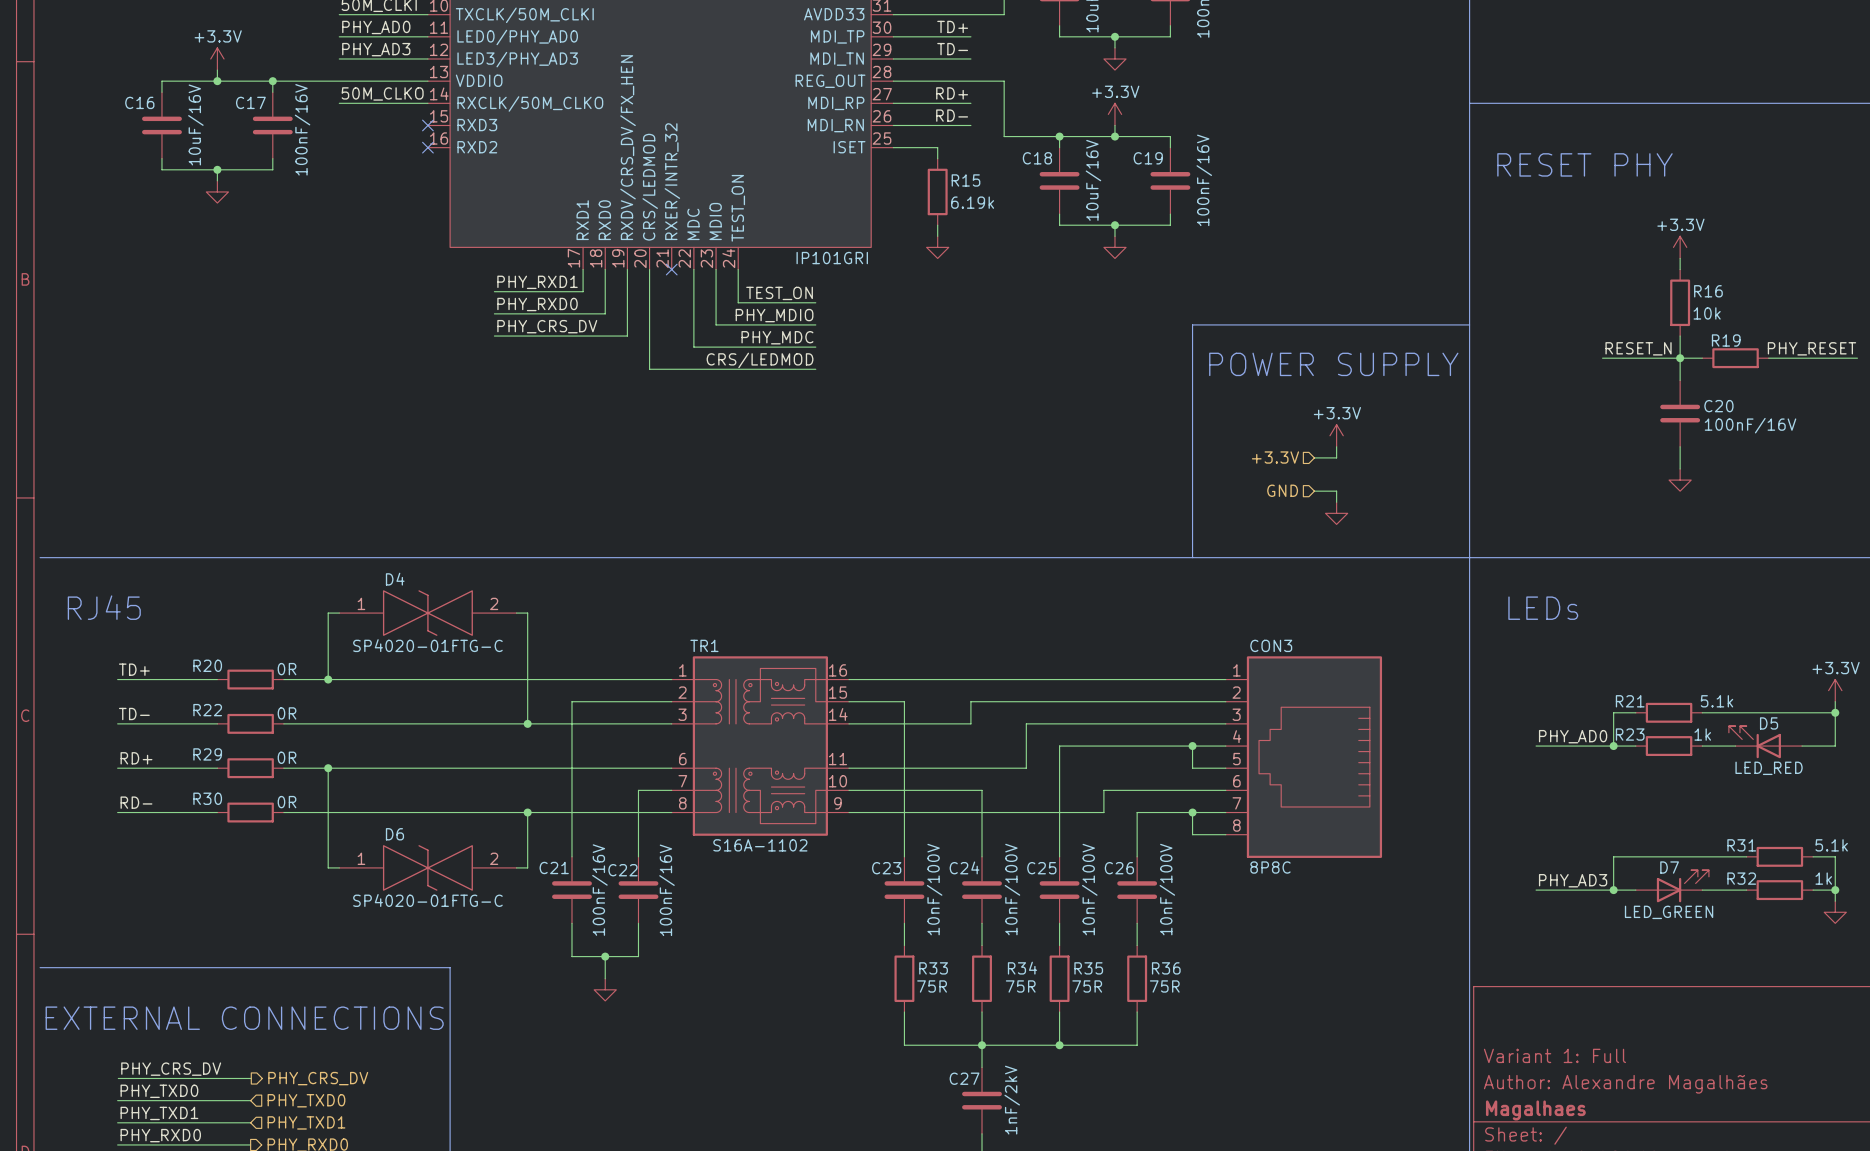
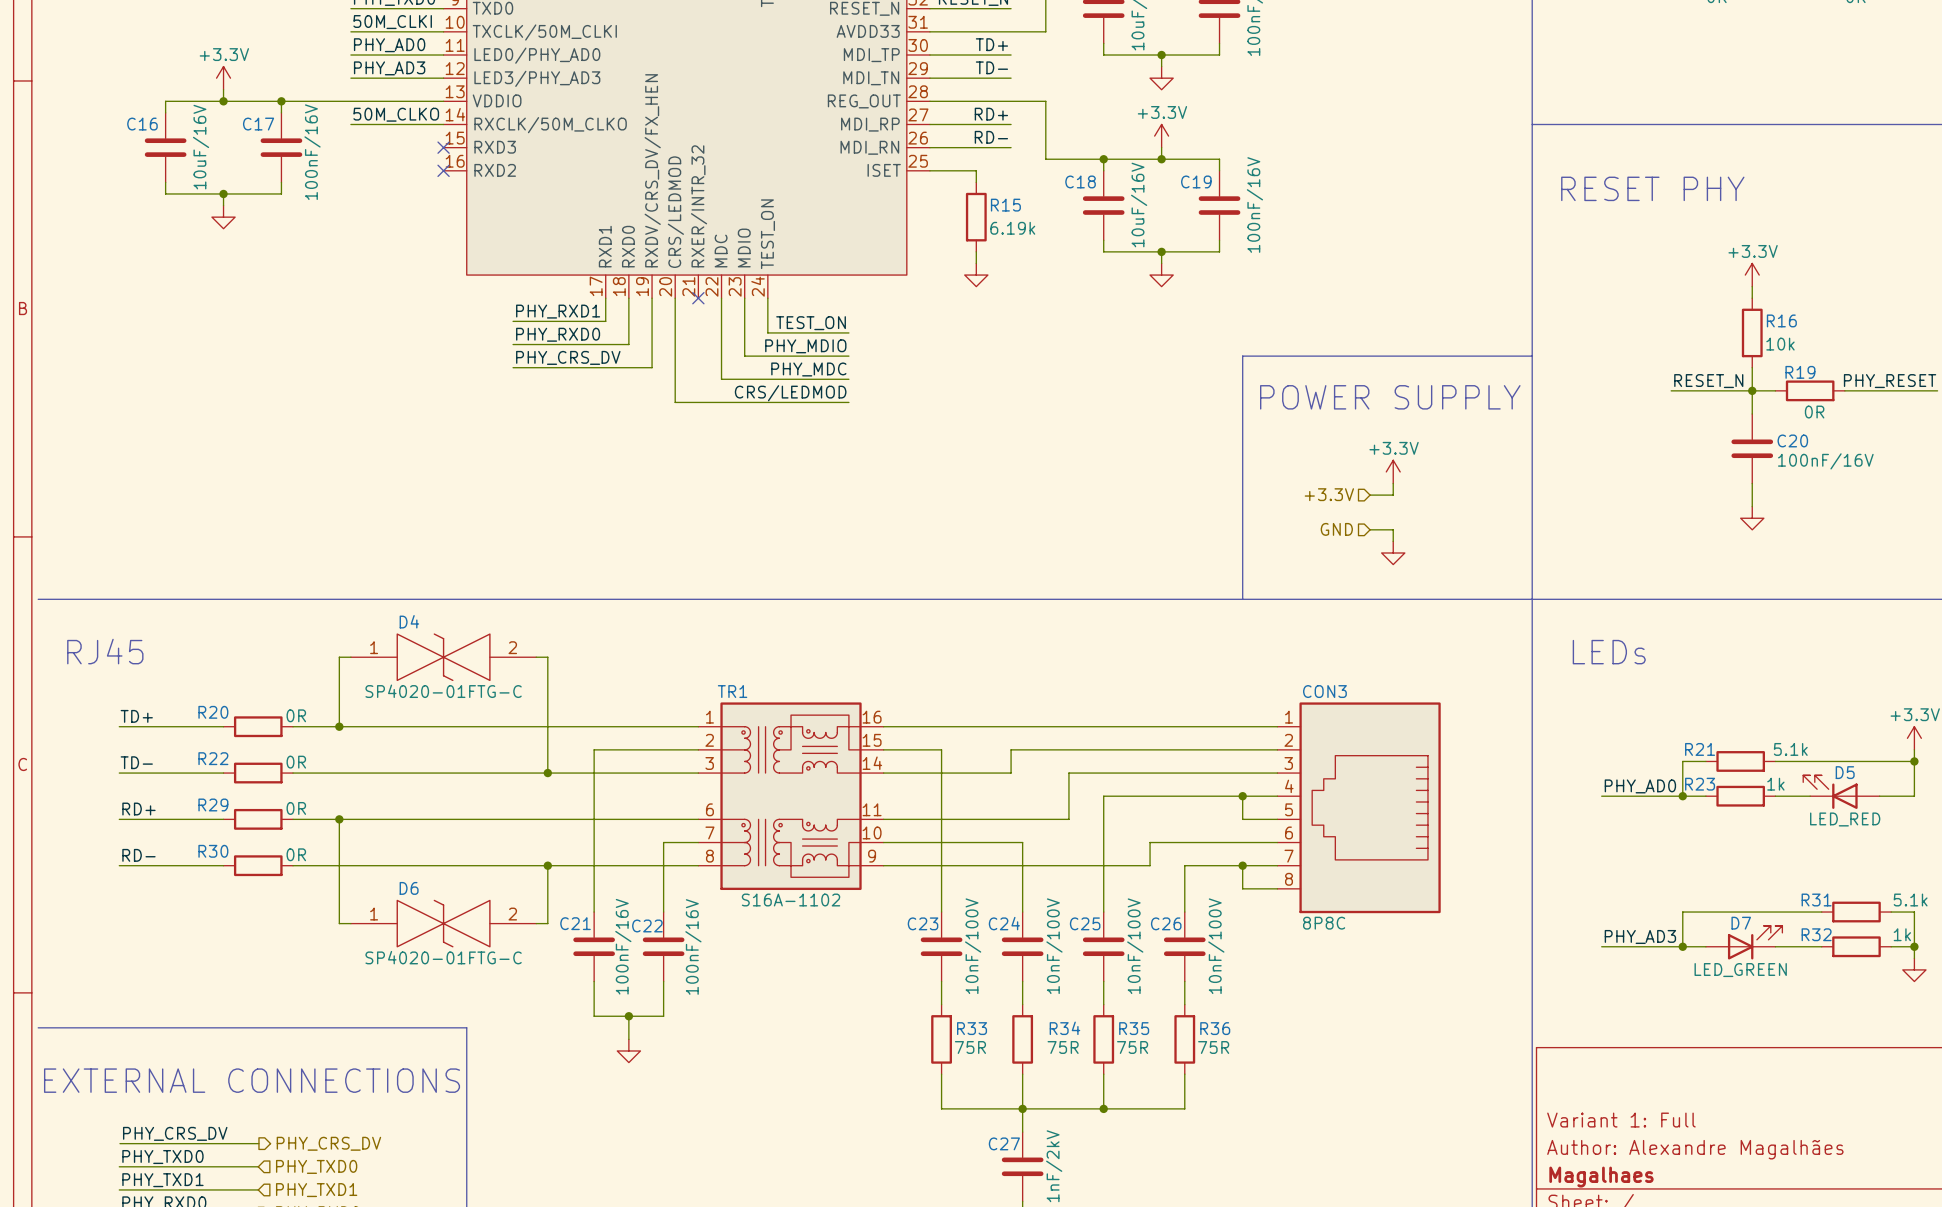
part value: IP101GRI (832, 258) -> none
R19 value: none -> 0R (1814, 412)

